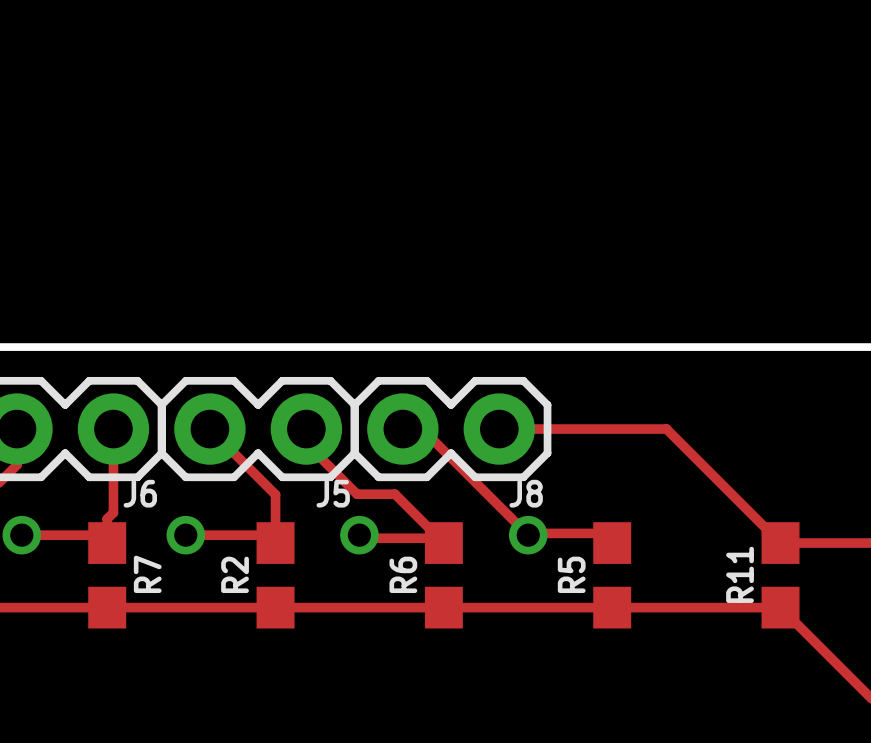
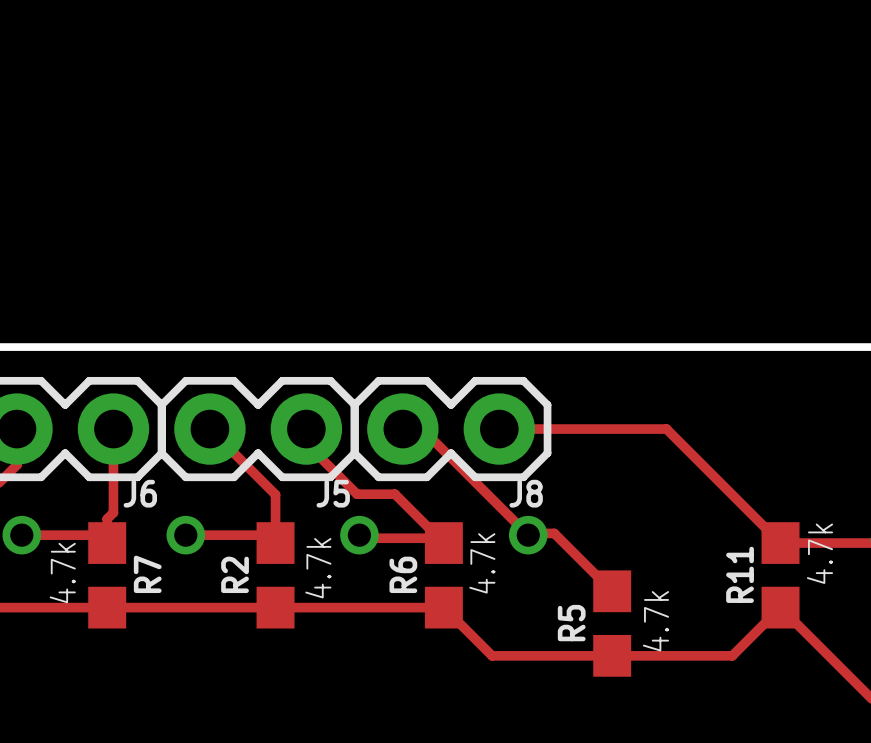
track: (554, 533) (602, 533) (612, 543) (607, 543) -> (554, 533) (612, 591)
text: none -> 4.7k (819, 553)
text: none -> 4.7k (482, 563)
text: none -> 4.7k (318, 568)
text: none -> 4.7k (62, 573)
R5 position: (612, 575) -> (612, 623)
track: (443, 607) (780, 607) -> (443, 607) (492, 655) (732, 655) (780, 607)
text: none -> 4.7k (655, 621)

